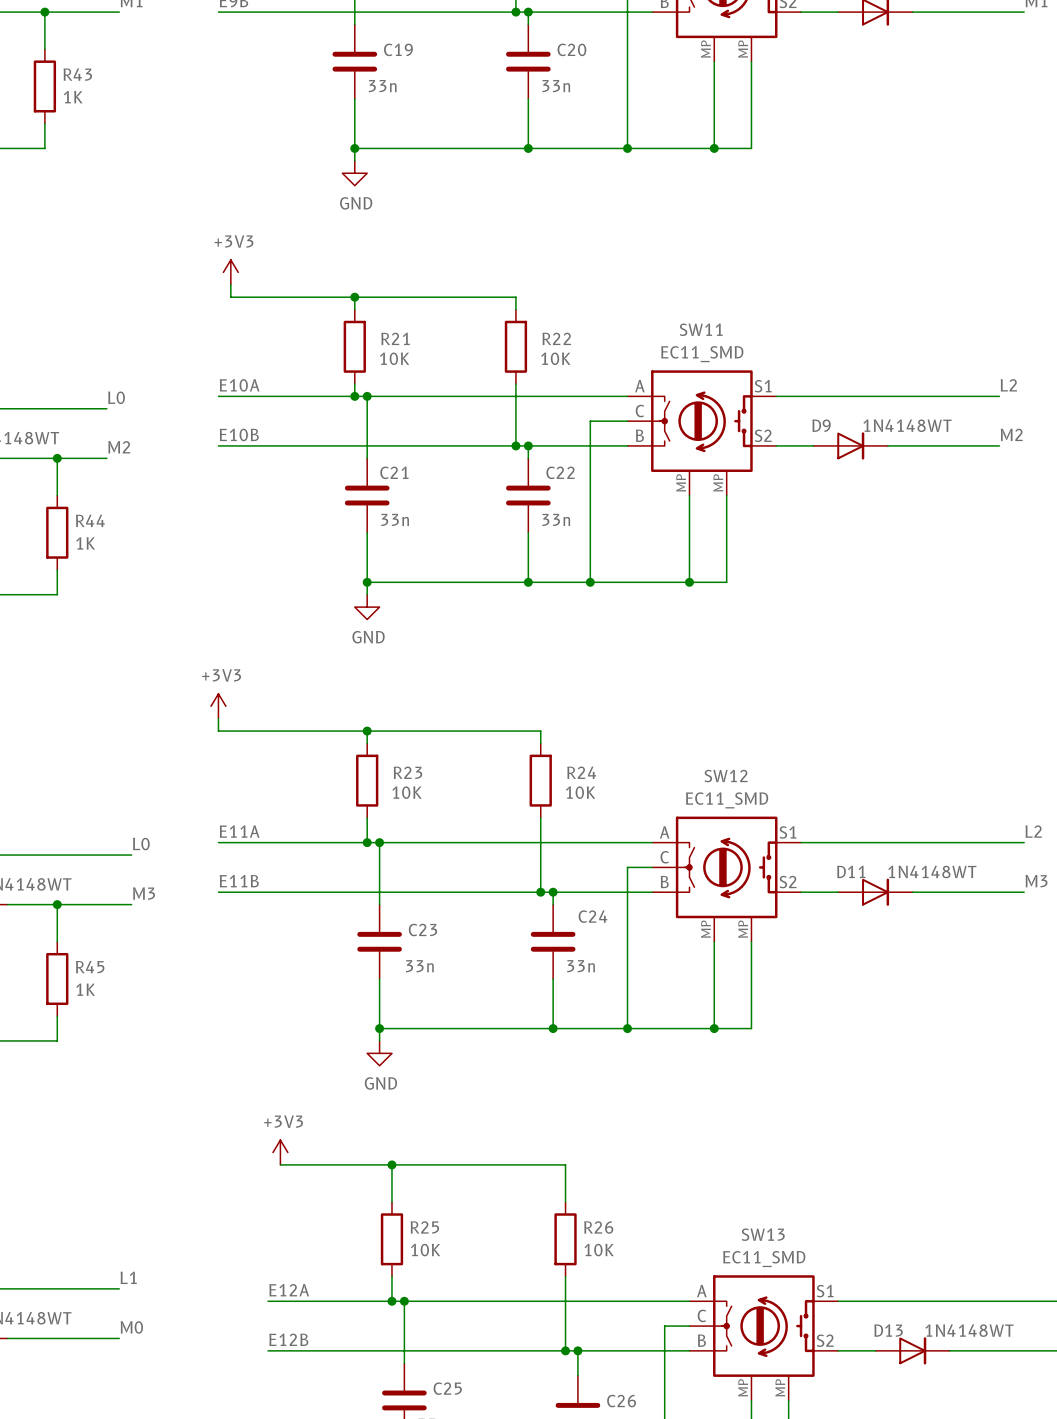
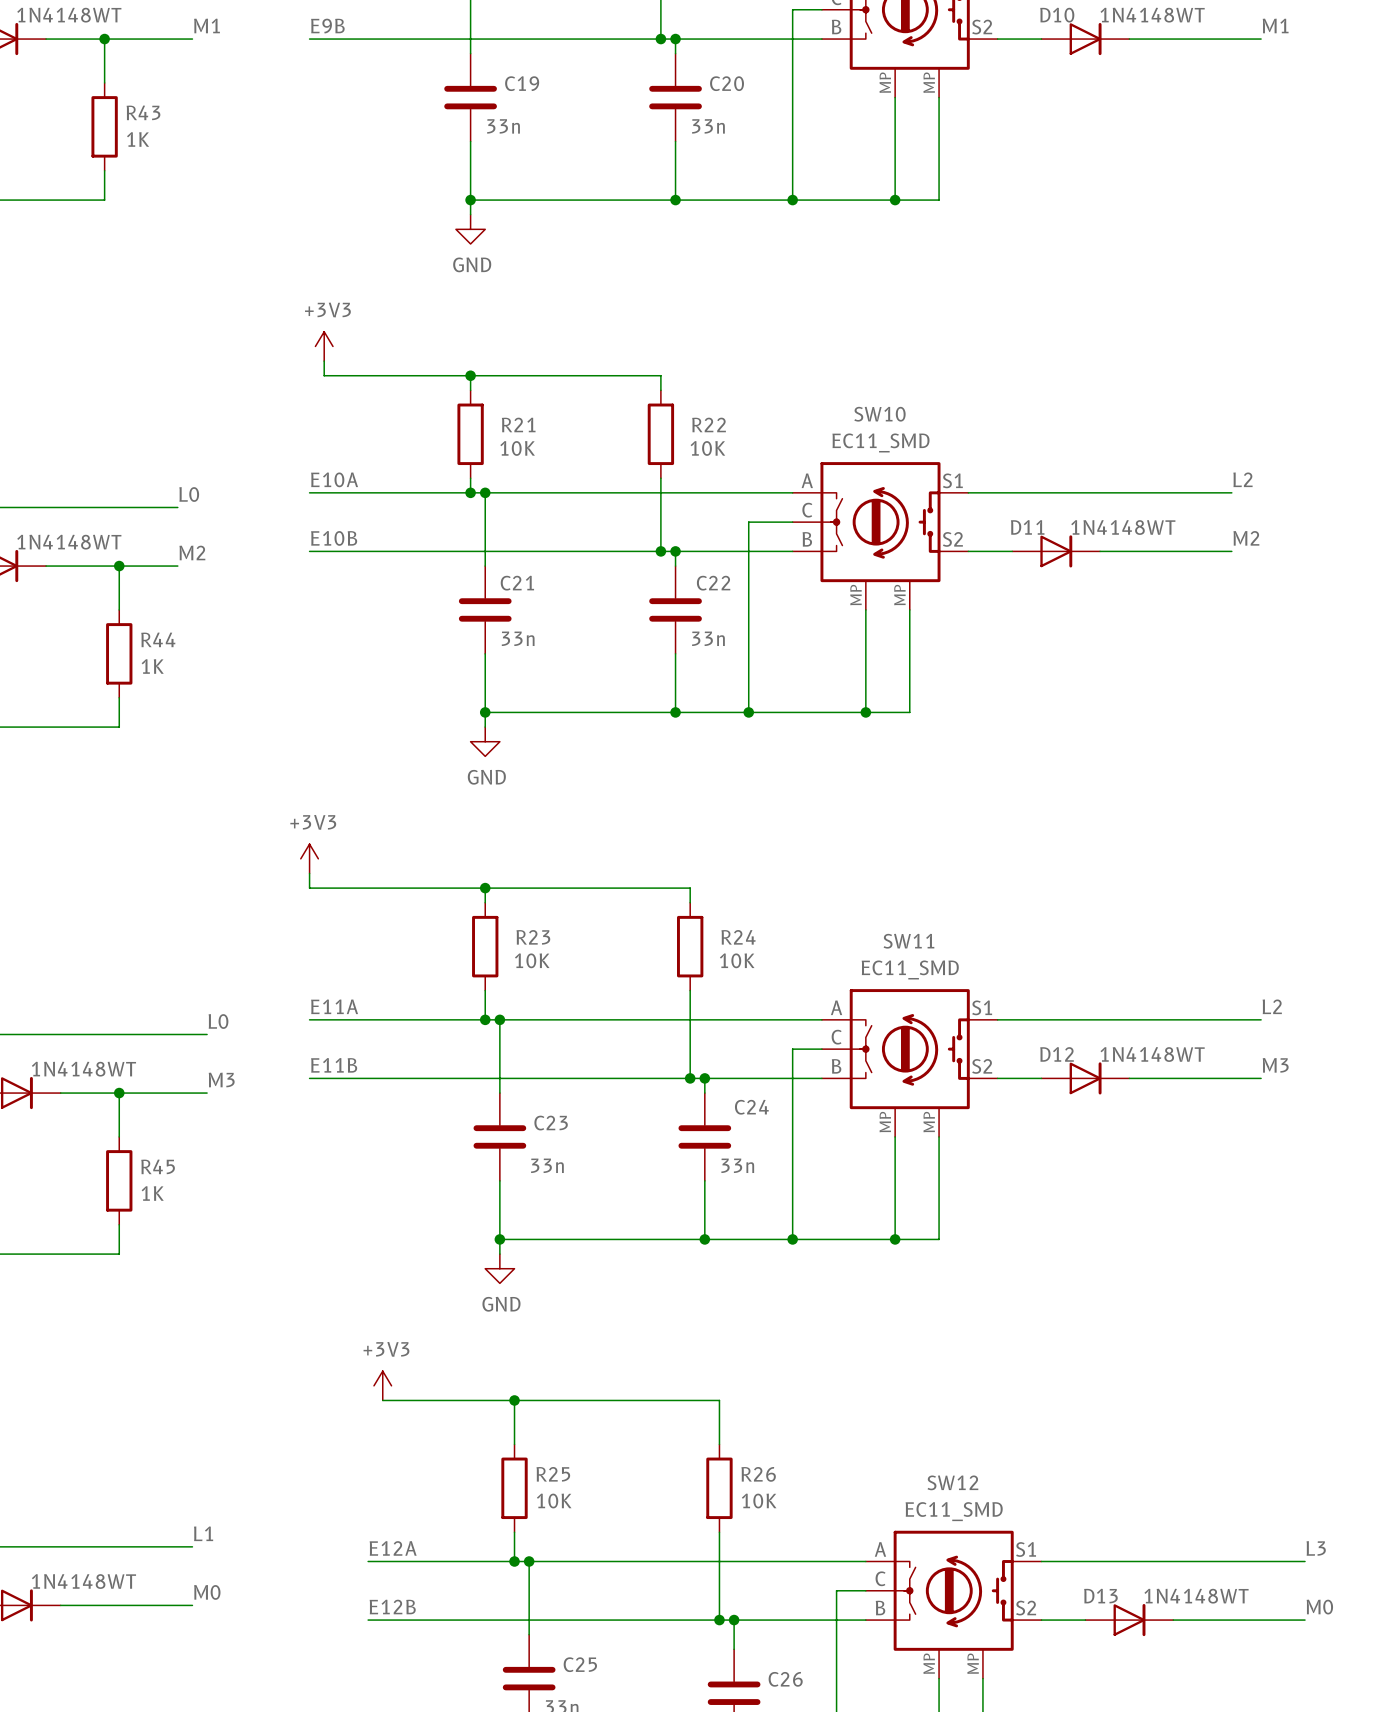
SW11 name: SW11 (701, 329) -> SW10 (879, 414)
D9 name: D9 (821, 425) -> D11 (1027, 527)
SW12 name: SW12 (726, 776) -> SW11 (908, 941)
D11 name: D11 (851, 871) -> D12 (1057, 1054)
SW13 name: SW13 (763, 1234) -> SW12 (952, 1482)

